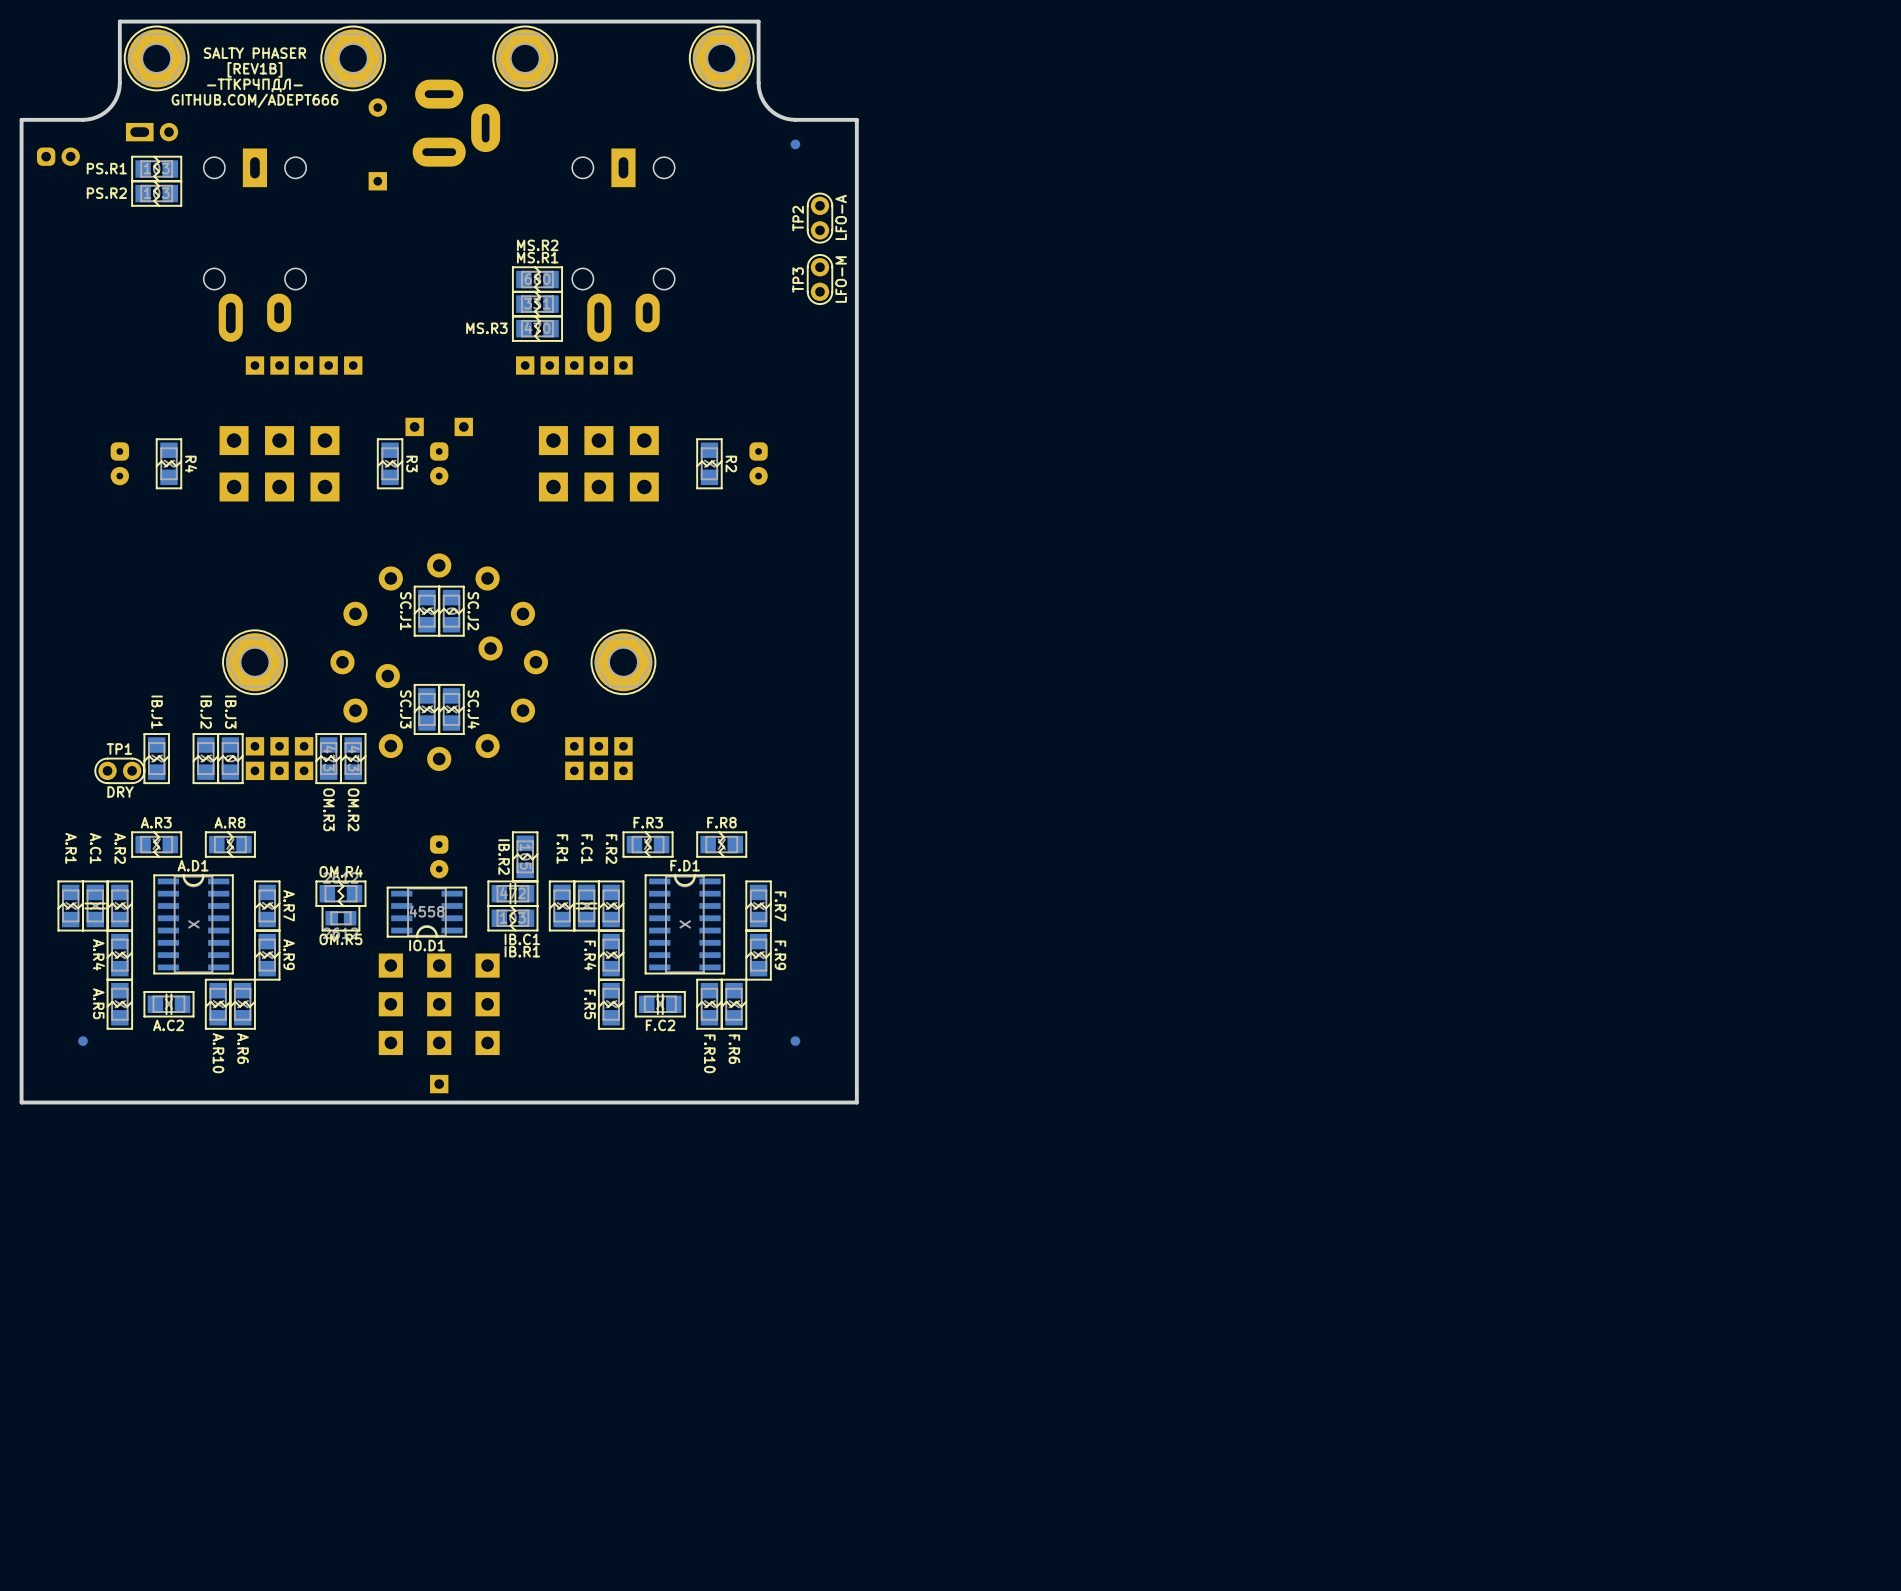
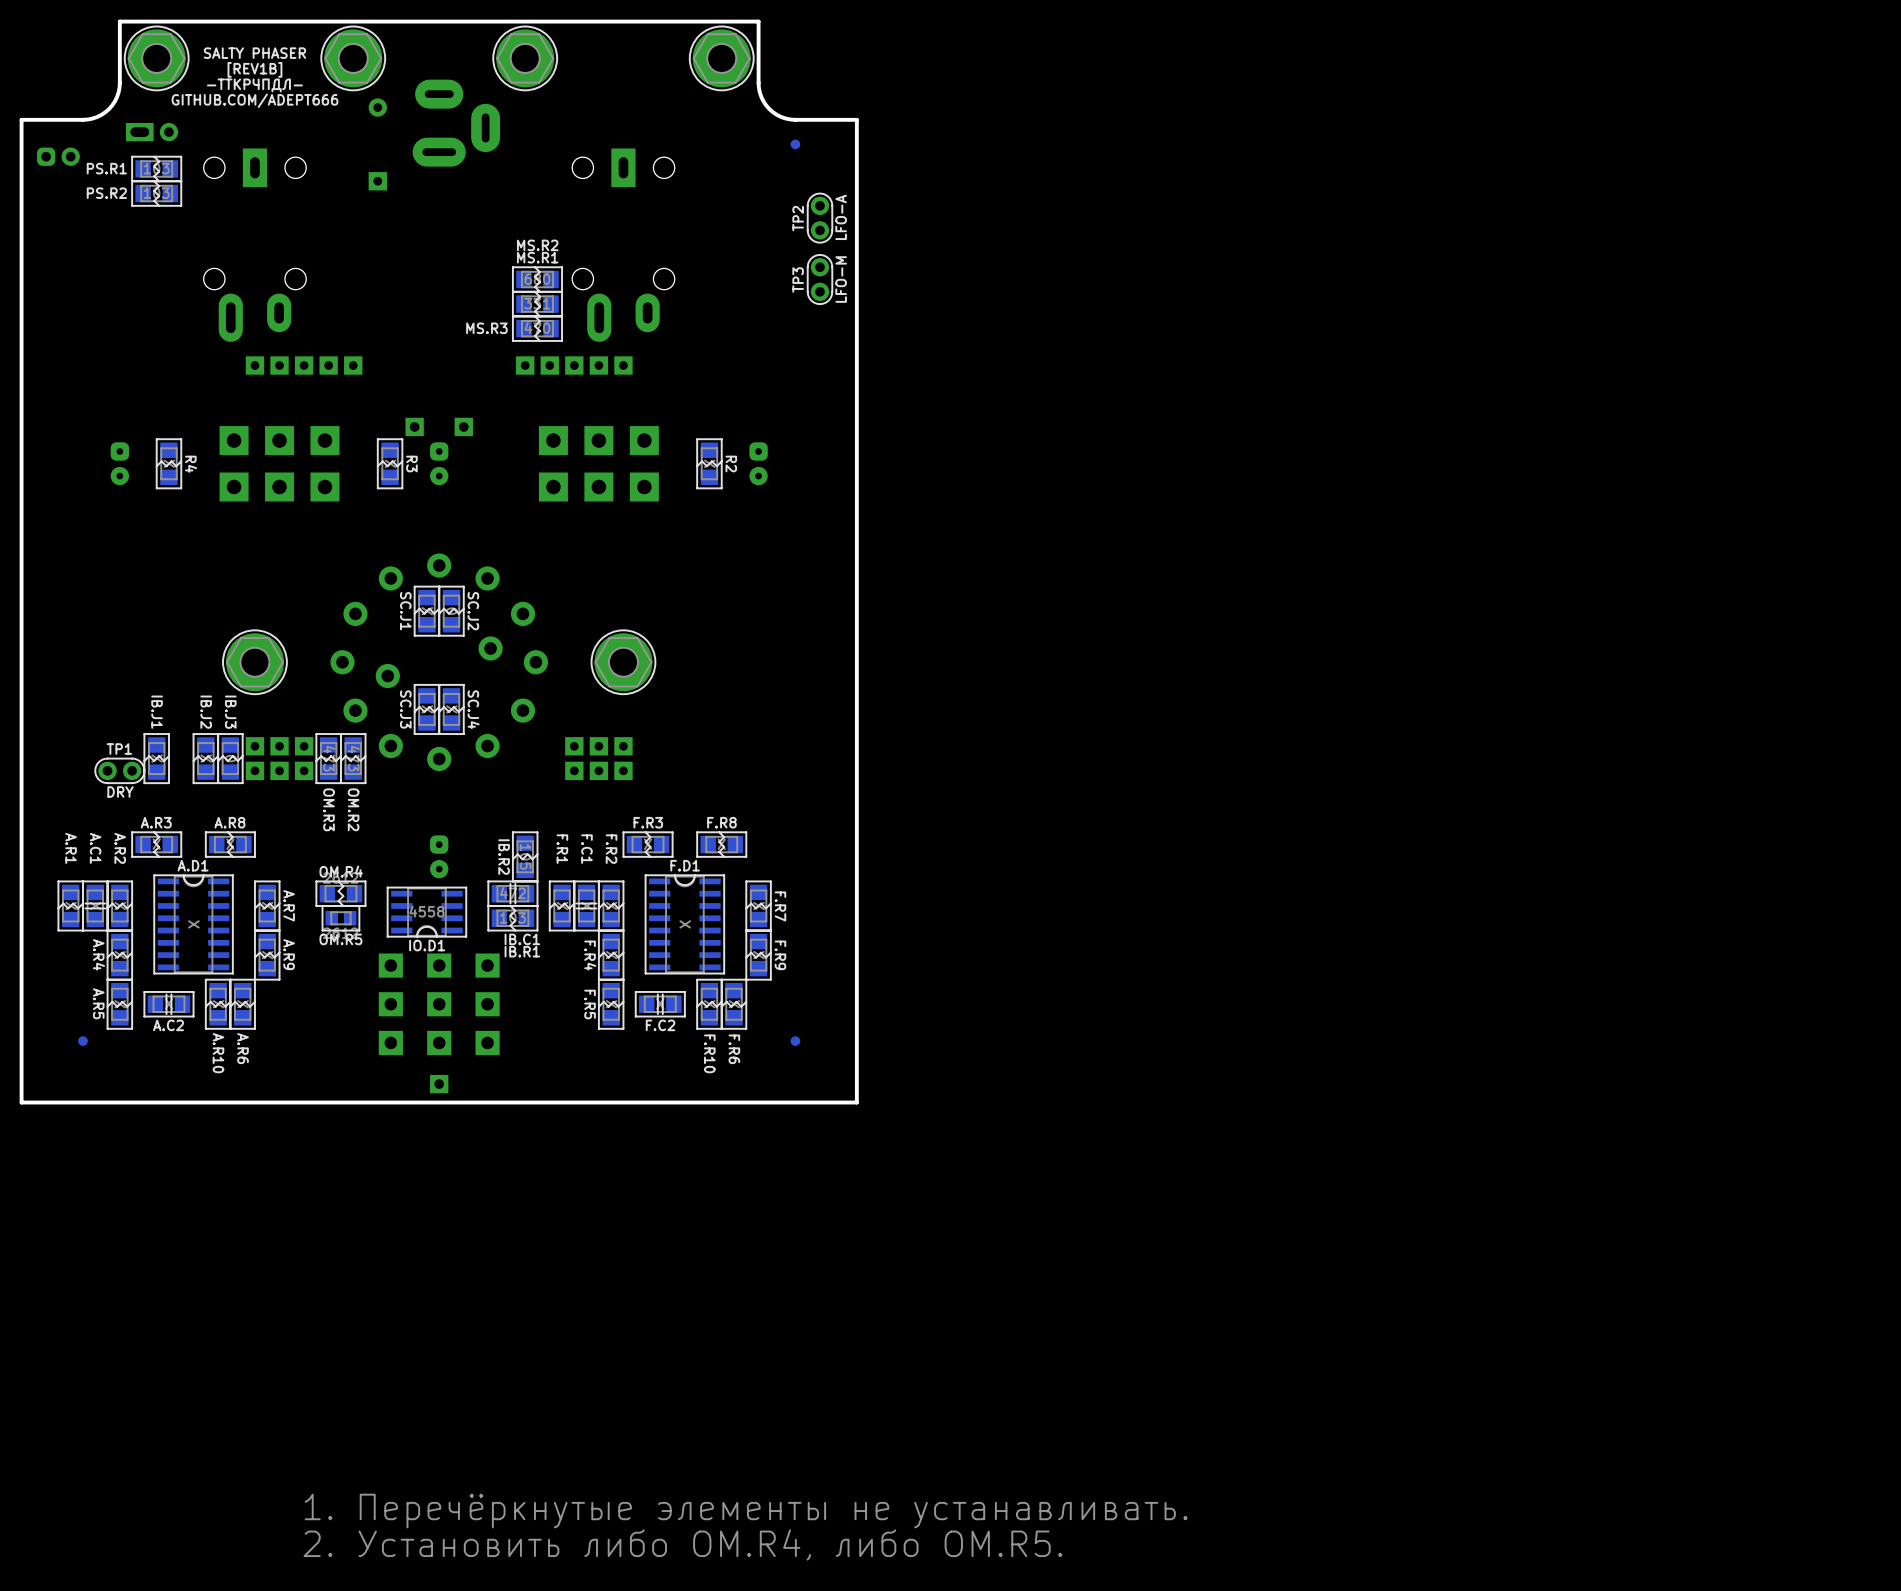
text: none -> 1. Перечёркнутые элементы не устанавливать. (746, 1511)
text: none -> 2. Установить либо OM.R4, либо OM.R5. (682, 1544)

